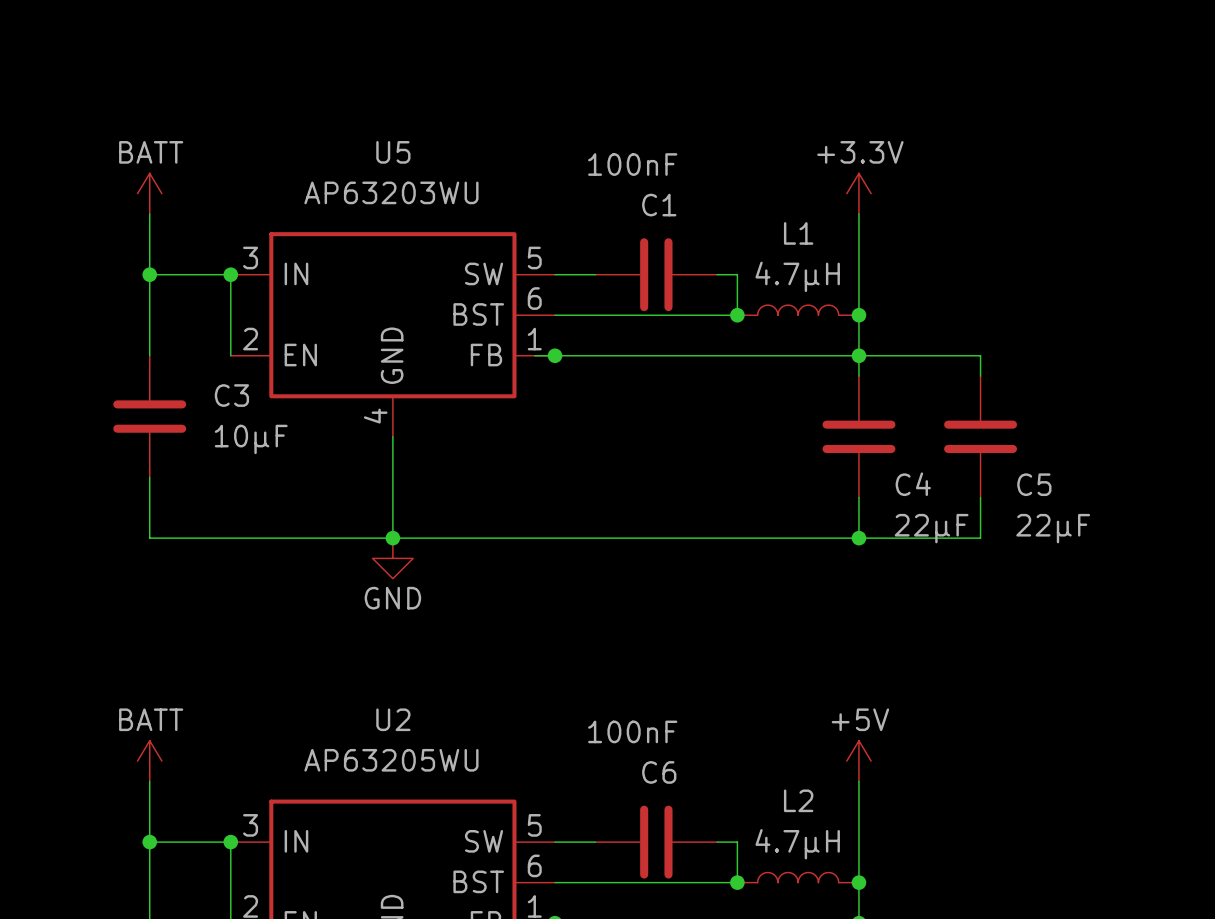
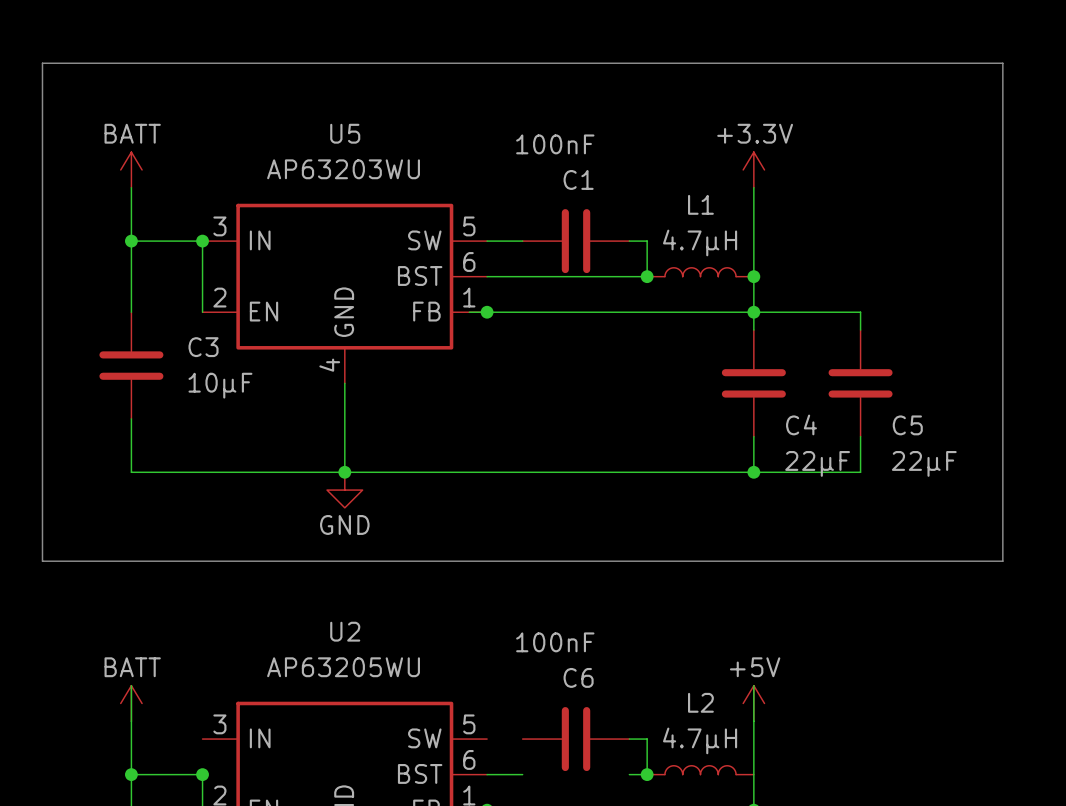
line: none -> (42, 63) (1002, 63) (1002, 561) (42, 561) (42, 63)
power symbol position: BATT (149, 761) -> BATT (131, 703)
power symbol position: +5V (858, 761) -> +5V (753, 703)
wire: (149, 842) (230, 842) (230, 882) -> (131, 774) (202, 774)
junction position: (149, 842) -> (131, 774)
junction position: (230, 842) -> (202, 774)
wire: (555, 842) (595, 842) -> none
wire: (595, 882) (717, 882) -> none
junction: (858, 882) -> none

